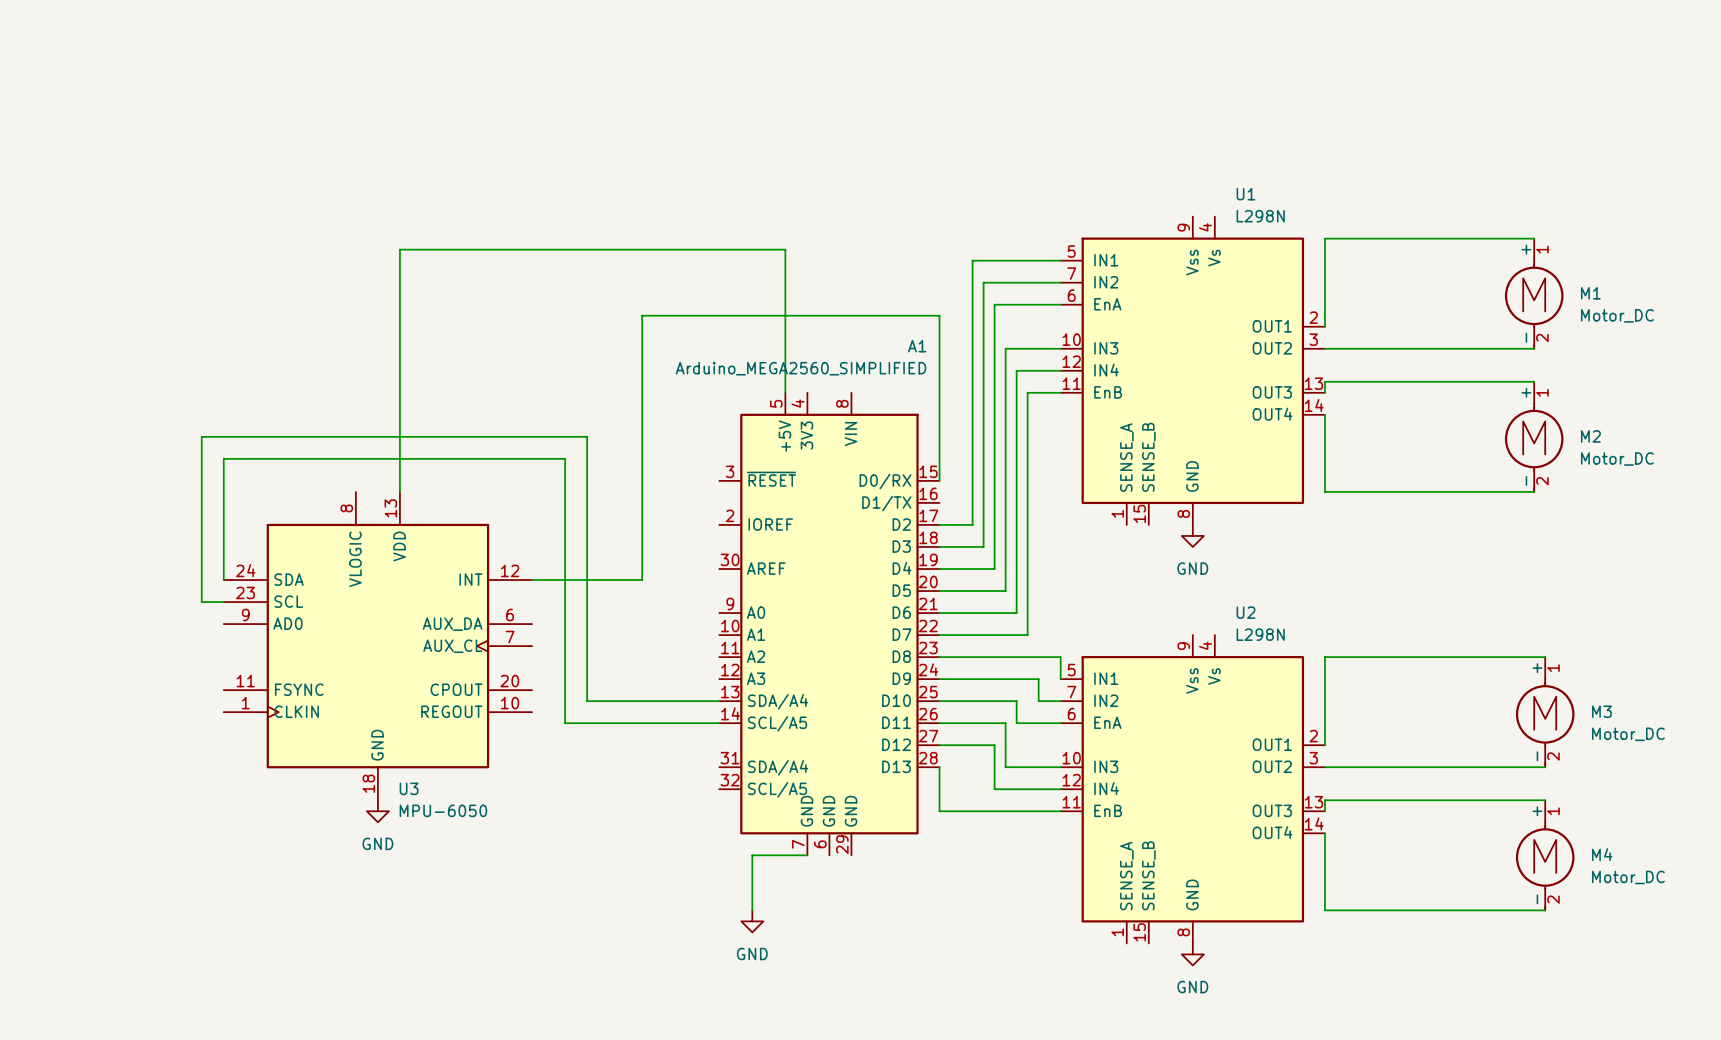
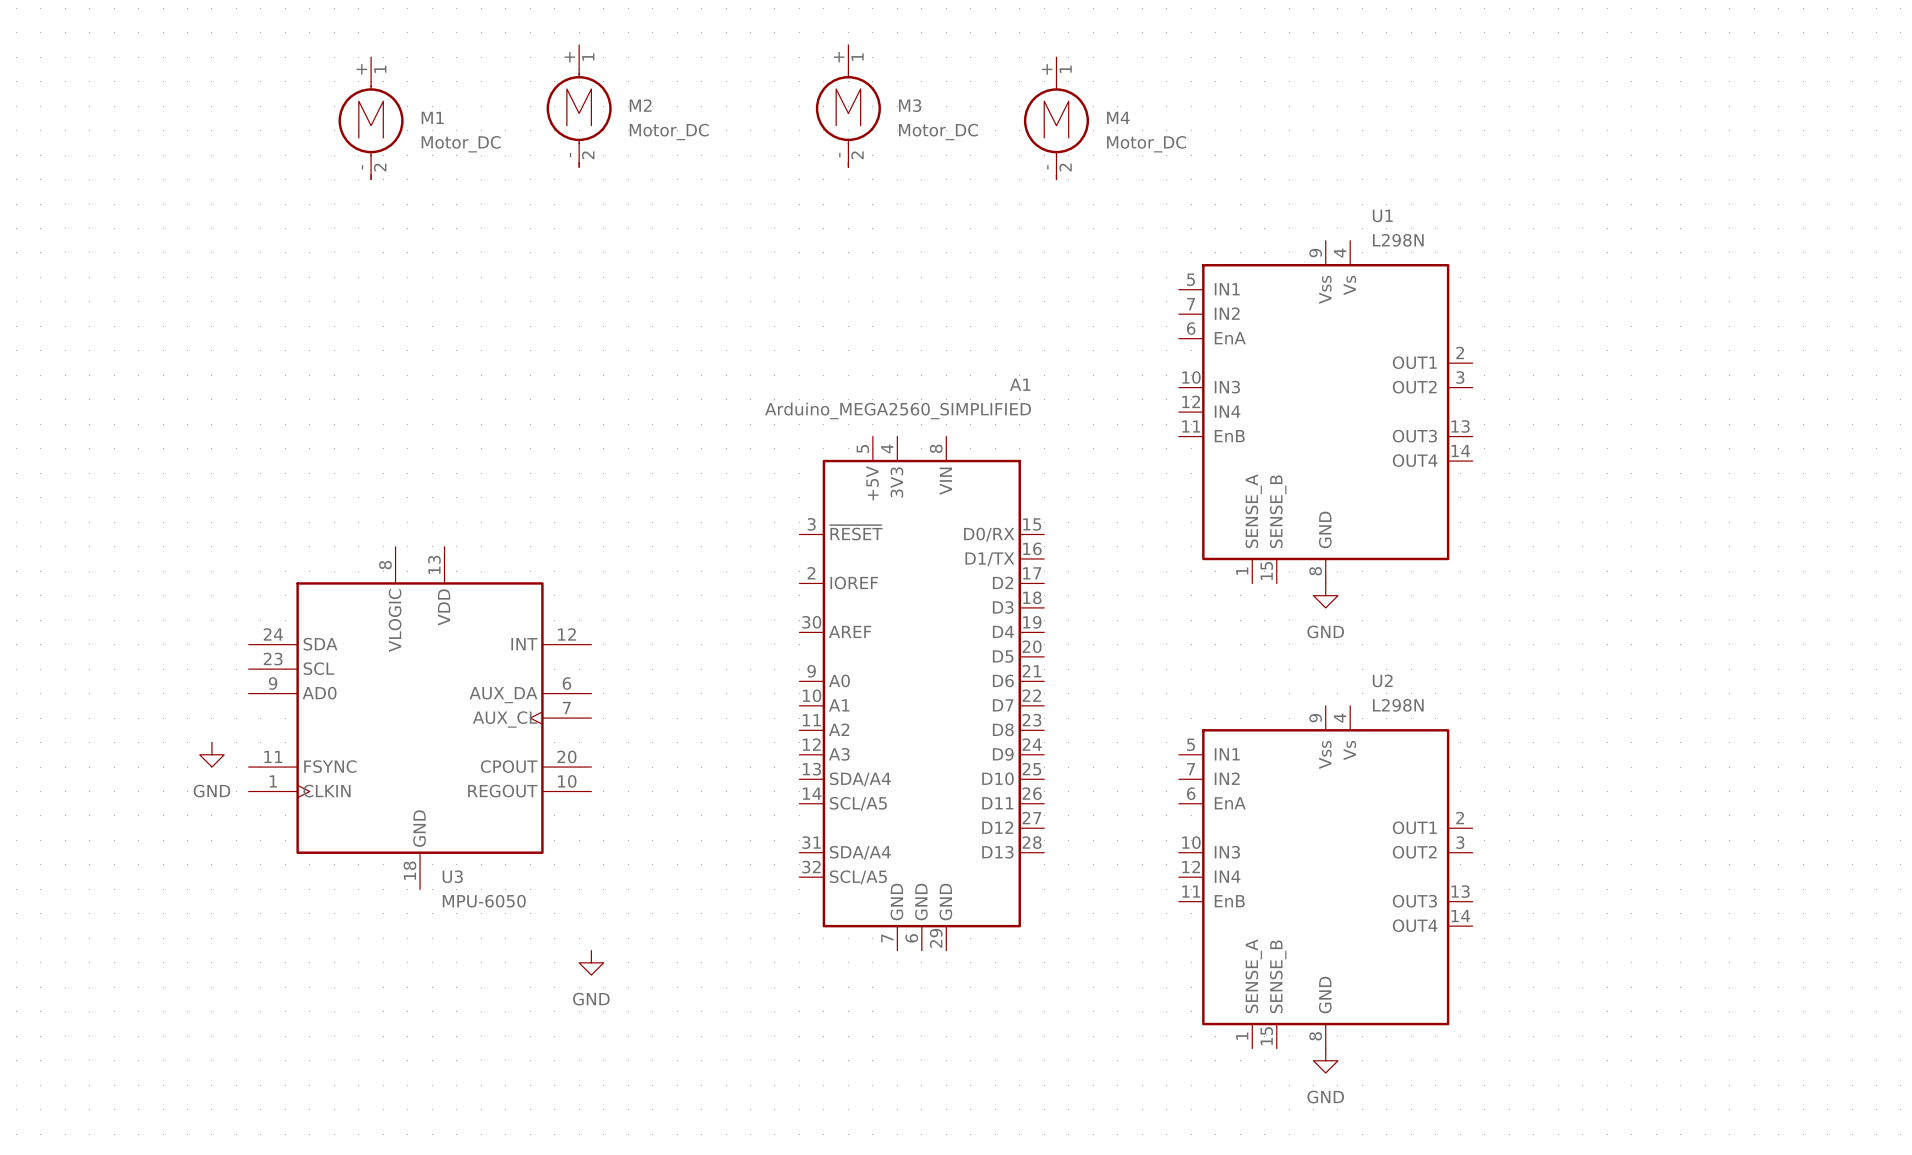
wire: (1534, 238) (1324, 238) (1324, 326) -> none
wire: (1060, 260) (972, 260) (972, 524) (939, 524) -> none
wire: (1060, 282) (983, 282) (983, 546) (939, 546) -> none
M1 position: (1534, 293) -> (371, 118)
wire: (1060, 304) (994, 304) (994, 569) (939, 569) -> none
wire: (1060, 348) (1005, 348) (1005, 591) (939, 591) -> none
wire: (1324, 348) (1534, 348) -> none
wire: (1060, 370) (1016, 370) (1016, 613) (939, 613) -> none
wire: (1534, 381) (1324, 381) (1324, 392) -> none
wire: (785, 392) (785, 249) (399, 249) (399, 491) -> none
wire: (1060, 392) (1027, 392) (1027, 635) (939, 635) -> none
wire: (1324, 414) (1324, 491) (1534, 491) -> none
M2 position: (1534, 436) -> (579, 106)
wire: (939, 480) (939, 315) (642, 315) (642, 580) (532, 580) -> none
wire: (223, 580) (223, 458) (565, 458) (565, 723) (719, 723) -> none
wire: (223, 602) (201, 602) (201, 436) (587, 436) (587, 701) (719, 701) -> none
wire: (939, 657) (1060, 657) (1060, 679) -> none
wire: (1545, 657) (1324, 657) (1324, 745) -> none
power symbol: none -> GND (211, 754)
wire: (939, 679) (1038, 679) (1038, 701) (1060, 701) -> none
wire: (939, 701) (1016, 701) (1016, 723) (1060, 723) -> none
M3 position: (1545, 712) -> (848, 106)
wire: (939, 723) (1005, 723) (1005, 767) (1060, 767) -> none
wire: (939, 745) (994, 745) (994, 789) (1060, 789) -> none
wire: (939, 767) (939, 811) (1060, 811) -> none
wire: (1324, 767) (1545, 767) -> none
wire: (1545, 800) (1324, 800) (1324, 811) -> none
power symbol: GND (377, 811) -> none
wire: (1324, 833) (1324, 910) (1545, 910) -> none
wire: (807, 855) (752, 855) (752, 910) -> none
M4 position: (1545, 855) -> (1056, 118)
power symbol: none -> GND (591, 962)
power symbol: GND (752, 921) -> none

